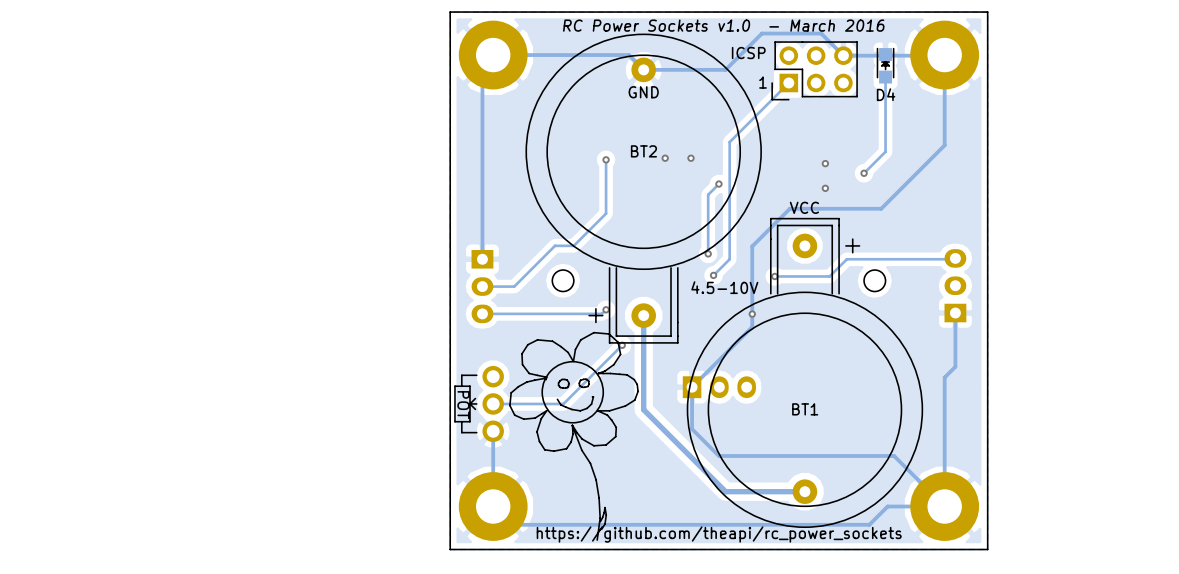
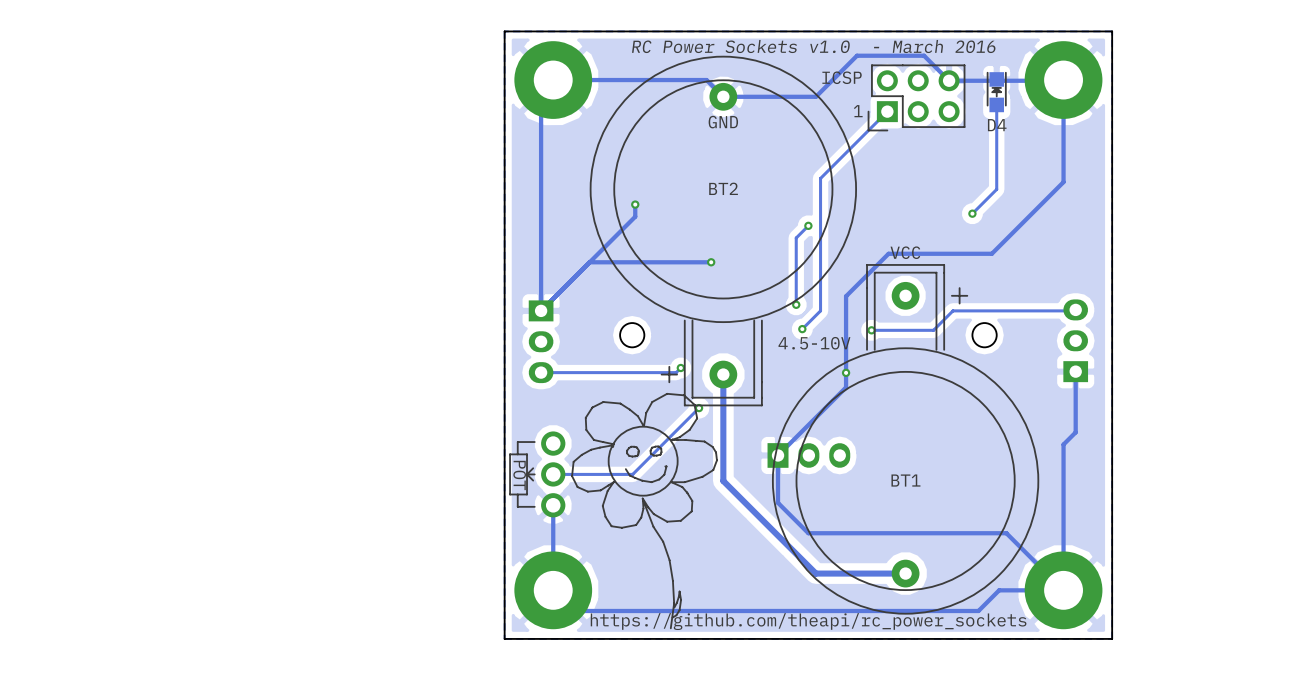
via: (665, 158) -> none
via: (690, 158) -> none
track: (606, 159) (606, 213) (573, 245) (555, 245) (514, 286) (482, 286) -> none
via: (606, 159) -> none
via: (825, 163) -> none
track: none -> (635, 204) (635, 216) (541, 310)
via: none -> (635, 204)
via: (825, 188) -> none
track: none -> (711, 262) (589, 262)
via: none -> (711, 262)

